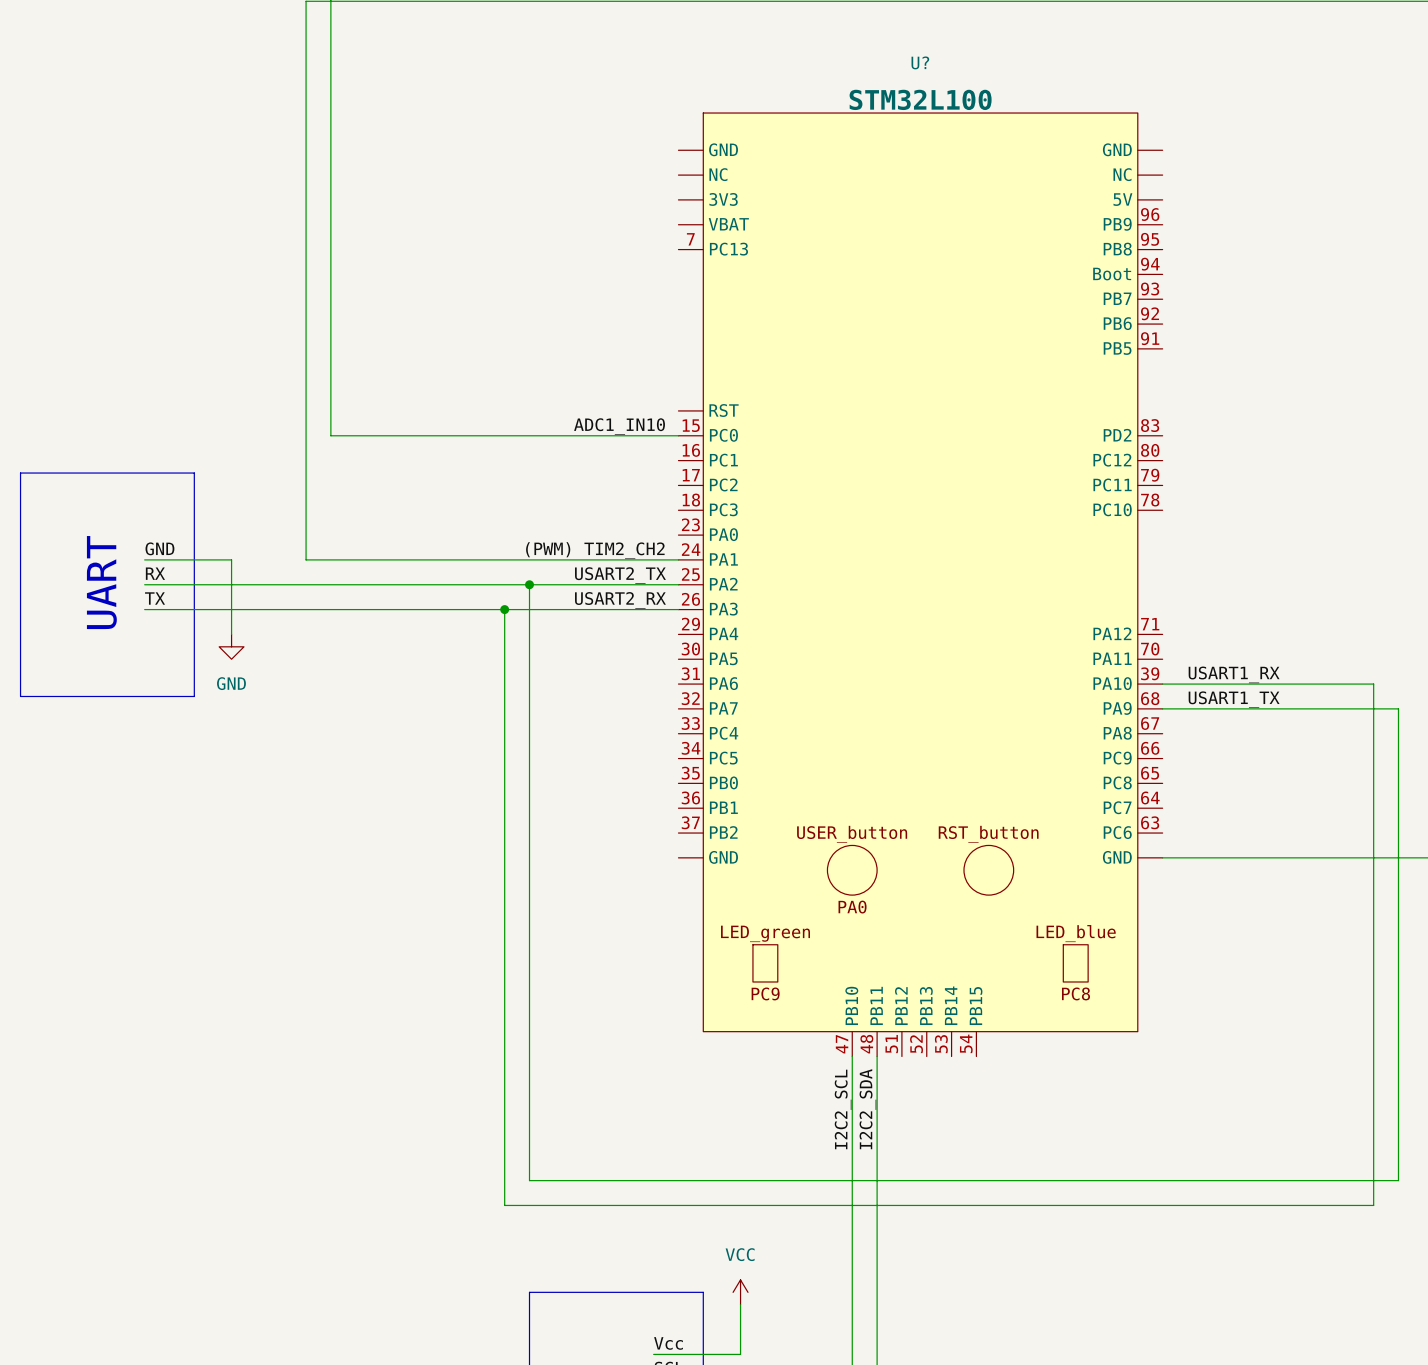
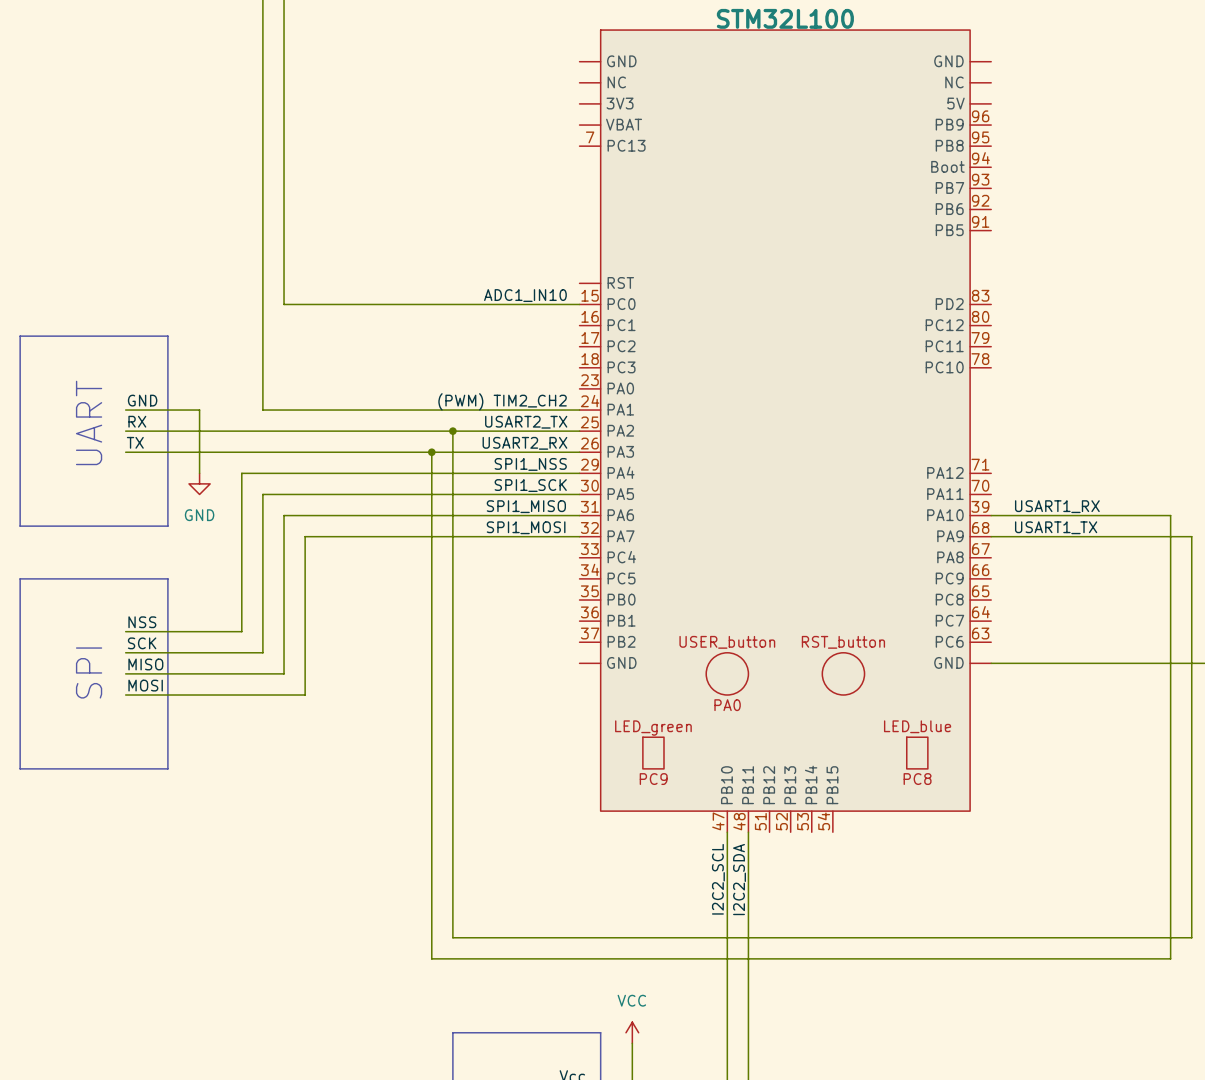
label: none -> SPI1_NSS (530, 464)
wire: none -> (579, 473) (241, 473) (241, 631) (125, 631)
label: none -> SPI1_SCK (530, 485)
wire: none -> (579, 494) (262, 494) (262, 652) (125, 652)
label: none -> SPI1_MISO (526, 506)
wire: none -> (579, 515) (284, 515) (284, 673) (125, 673)
label: none -> SPI1_MOSI (526, 527)
wire: none -> (579, 536) (305, 536) (305, 695) (125, 695)
line: none -> (20, 578) (20, 768) (167, 768) (167, 578) (20, 578)
label: none -> NSS (142, 622)
label: none -> SCK (142, 643)
label: none -> MISO (145, 664)
text: none -> SPI (89, 672)
label: none -> MOSI (145, 685)

